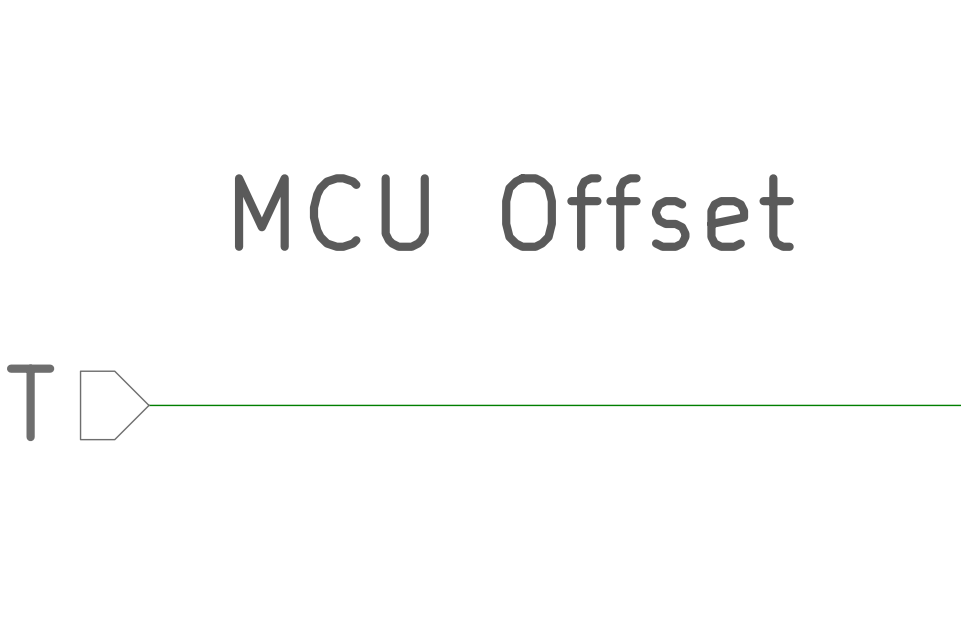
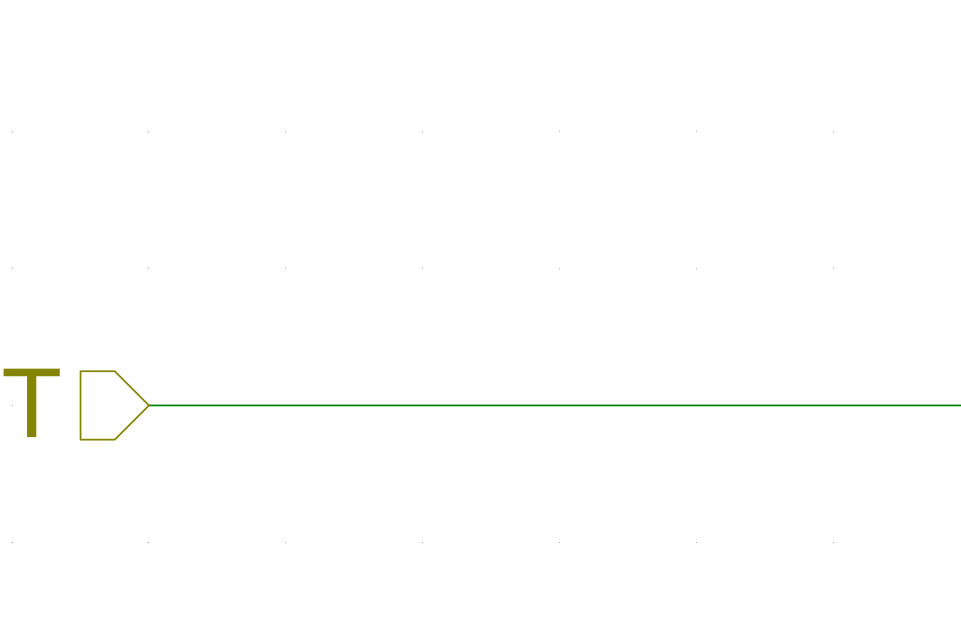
text: MCU Offset (514, 212) -> none

